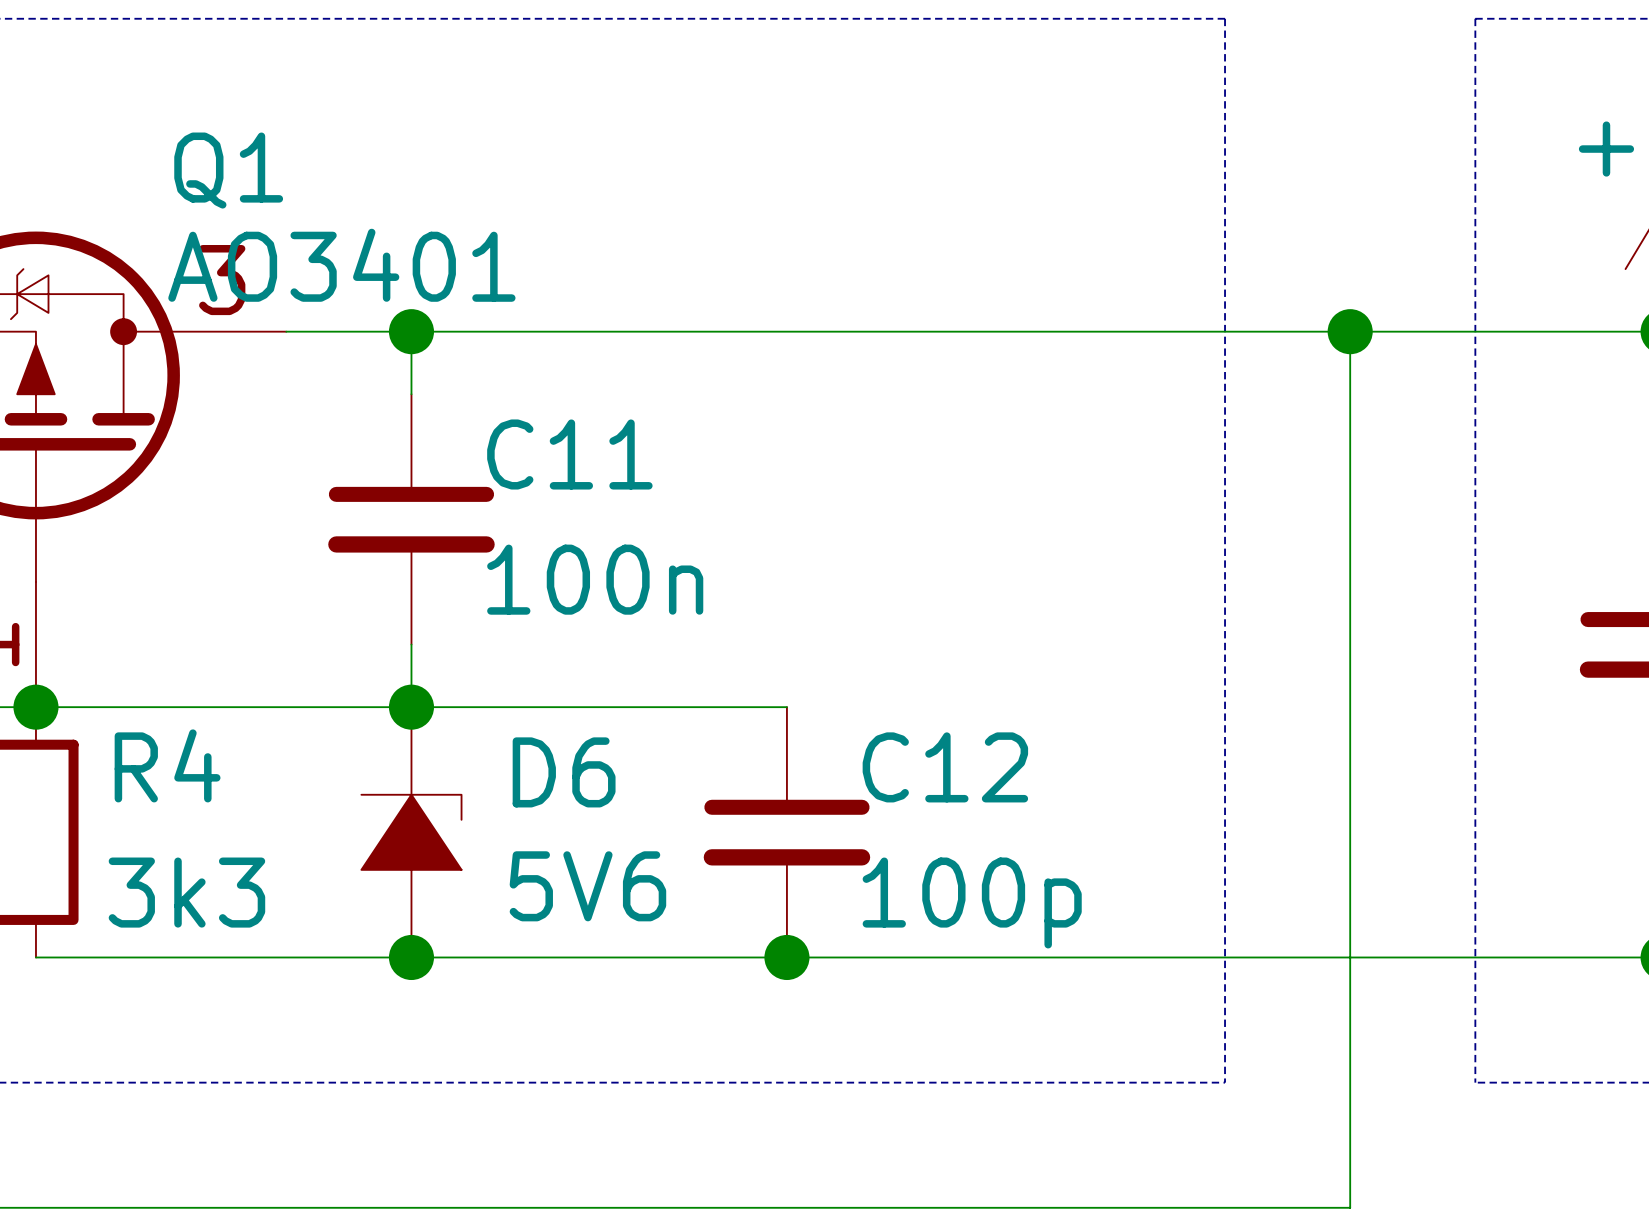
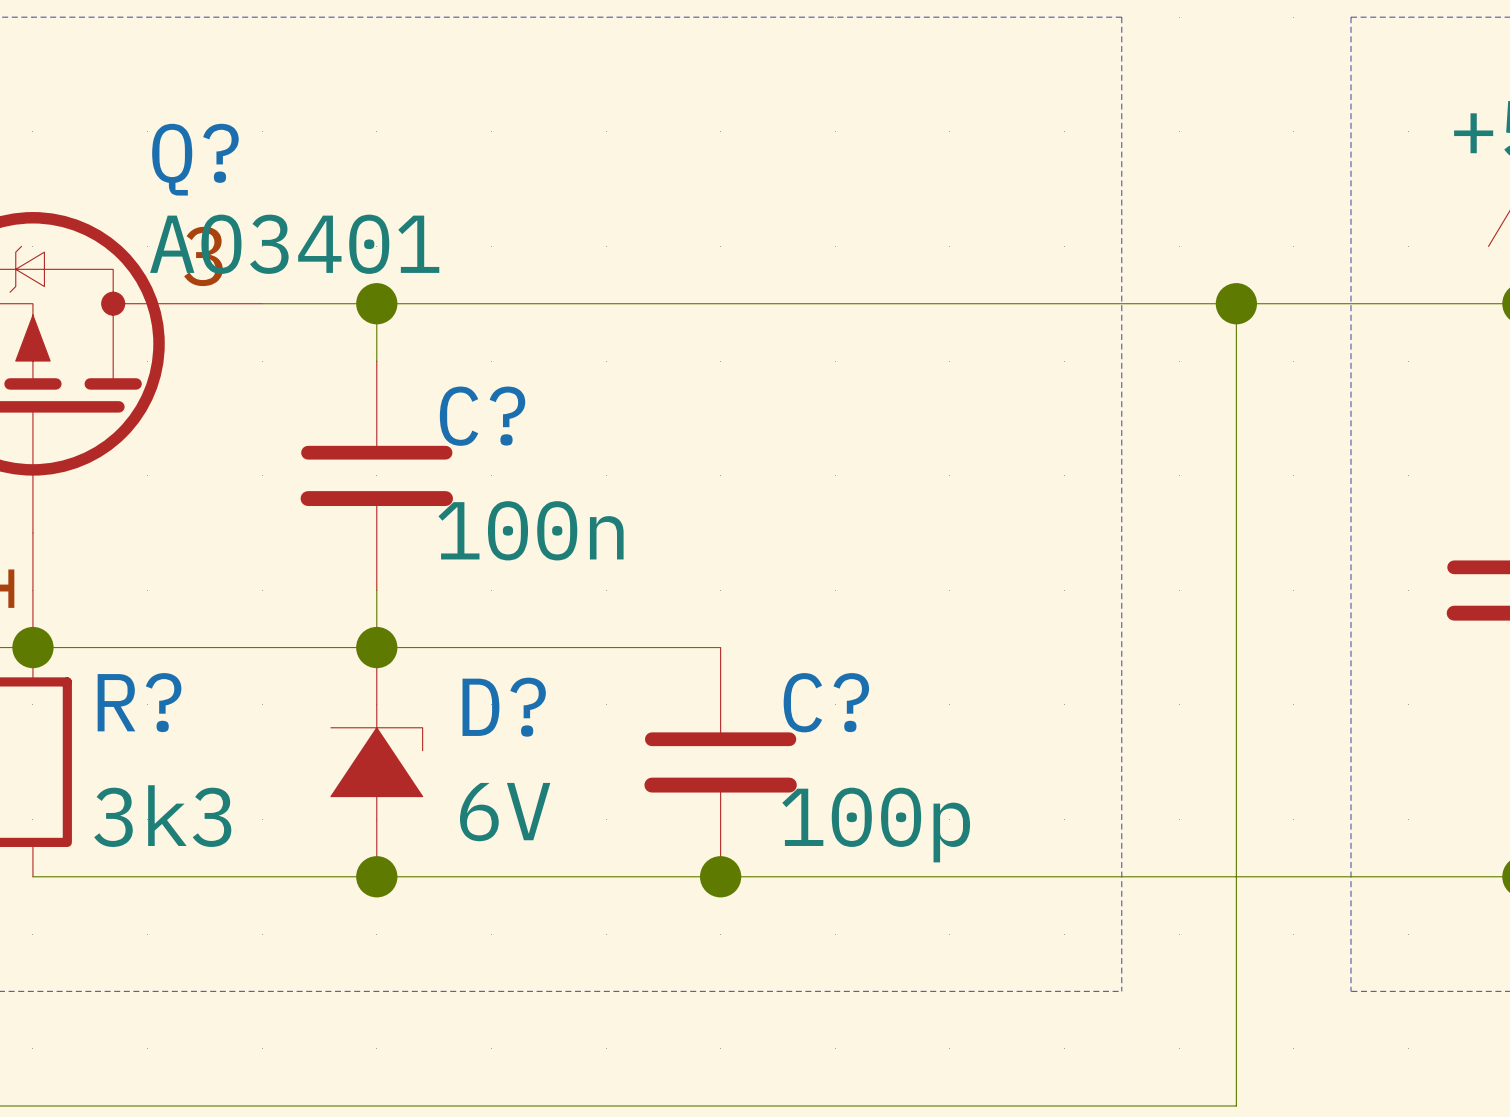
Q1 name: Q1 (228, 170) -> Q? (195, 159)
C11 name: C11 (569, 454) -> C? (482, 416)
R4 name: R4 (167, 765) -> R? (139, 702)
C12 name: C12 (945, 767) -> C? (826, 702)
D6 name: D6 (564, 772) -> D? (504, 707)
D6 value: 5V6 (587, 886) -> 6V (505, 812)

